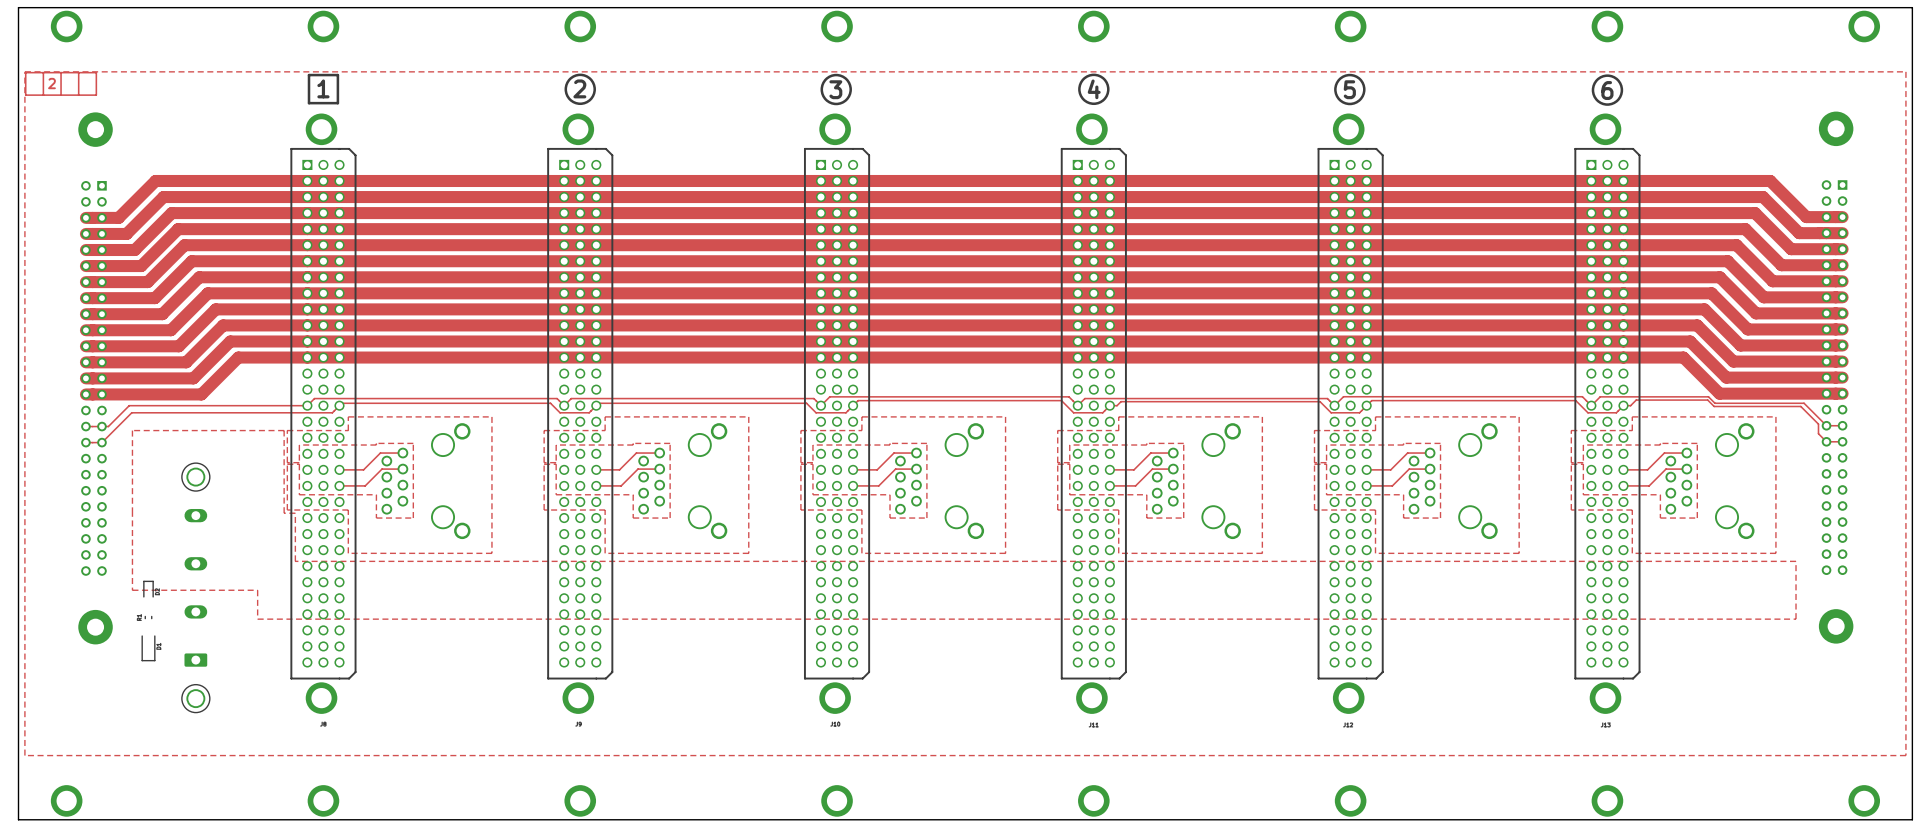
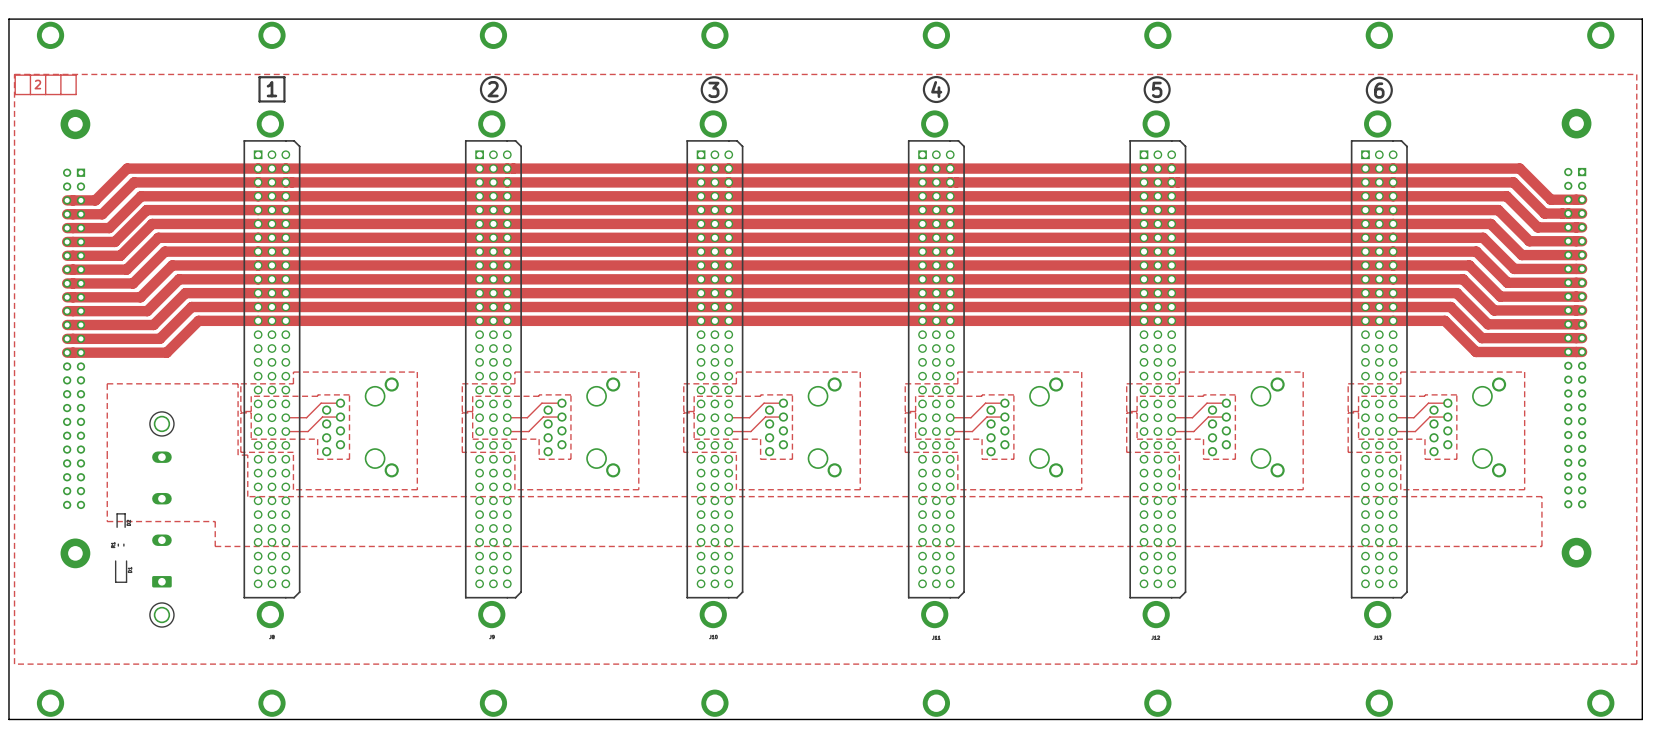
track: (1842, 425) (1826, 425) (1804, 403) (1714, 403) (1708, 396) (1600, 396) (1591, 405) (1582, 396) (1343, 396) (1334, 405) (1327, 398) (1084, 398) (1077, 405) (1068, 396) (829, 396) (820, 405) (813, 398) (571, 398) (564, 405) (557, 398) (314, 398) (307, 405) (129, 405) (108, 426) (85, 426) -> none
track: (1842, 441) (1826, 441) (1818, 433) (1818, 424) (1800, 406) (1714, 406) (1707, 400) (1636, 400) (1630, 405) (1623, 405) (1616, 412) (1587, 412) (1575, 400) (1371, 400) (1359, 412) (1331, 412) (1320, 401) (1121, 401) (1117, 405) (1109, 405) (1102, 412) (1073, 412) (1061, 400) (858, 400) (845, 412) (816, 412) (806, 403) (598, 403) (589, 412) (560, 412) (550, 403) (341, 403) (332, 412) (131, 412) (101, 442) (85, 442) -> none

